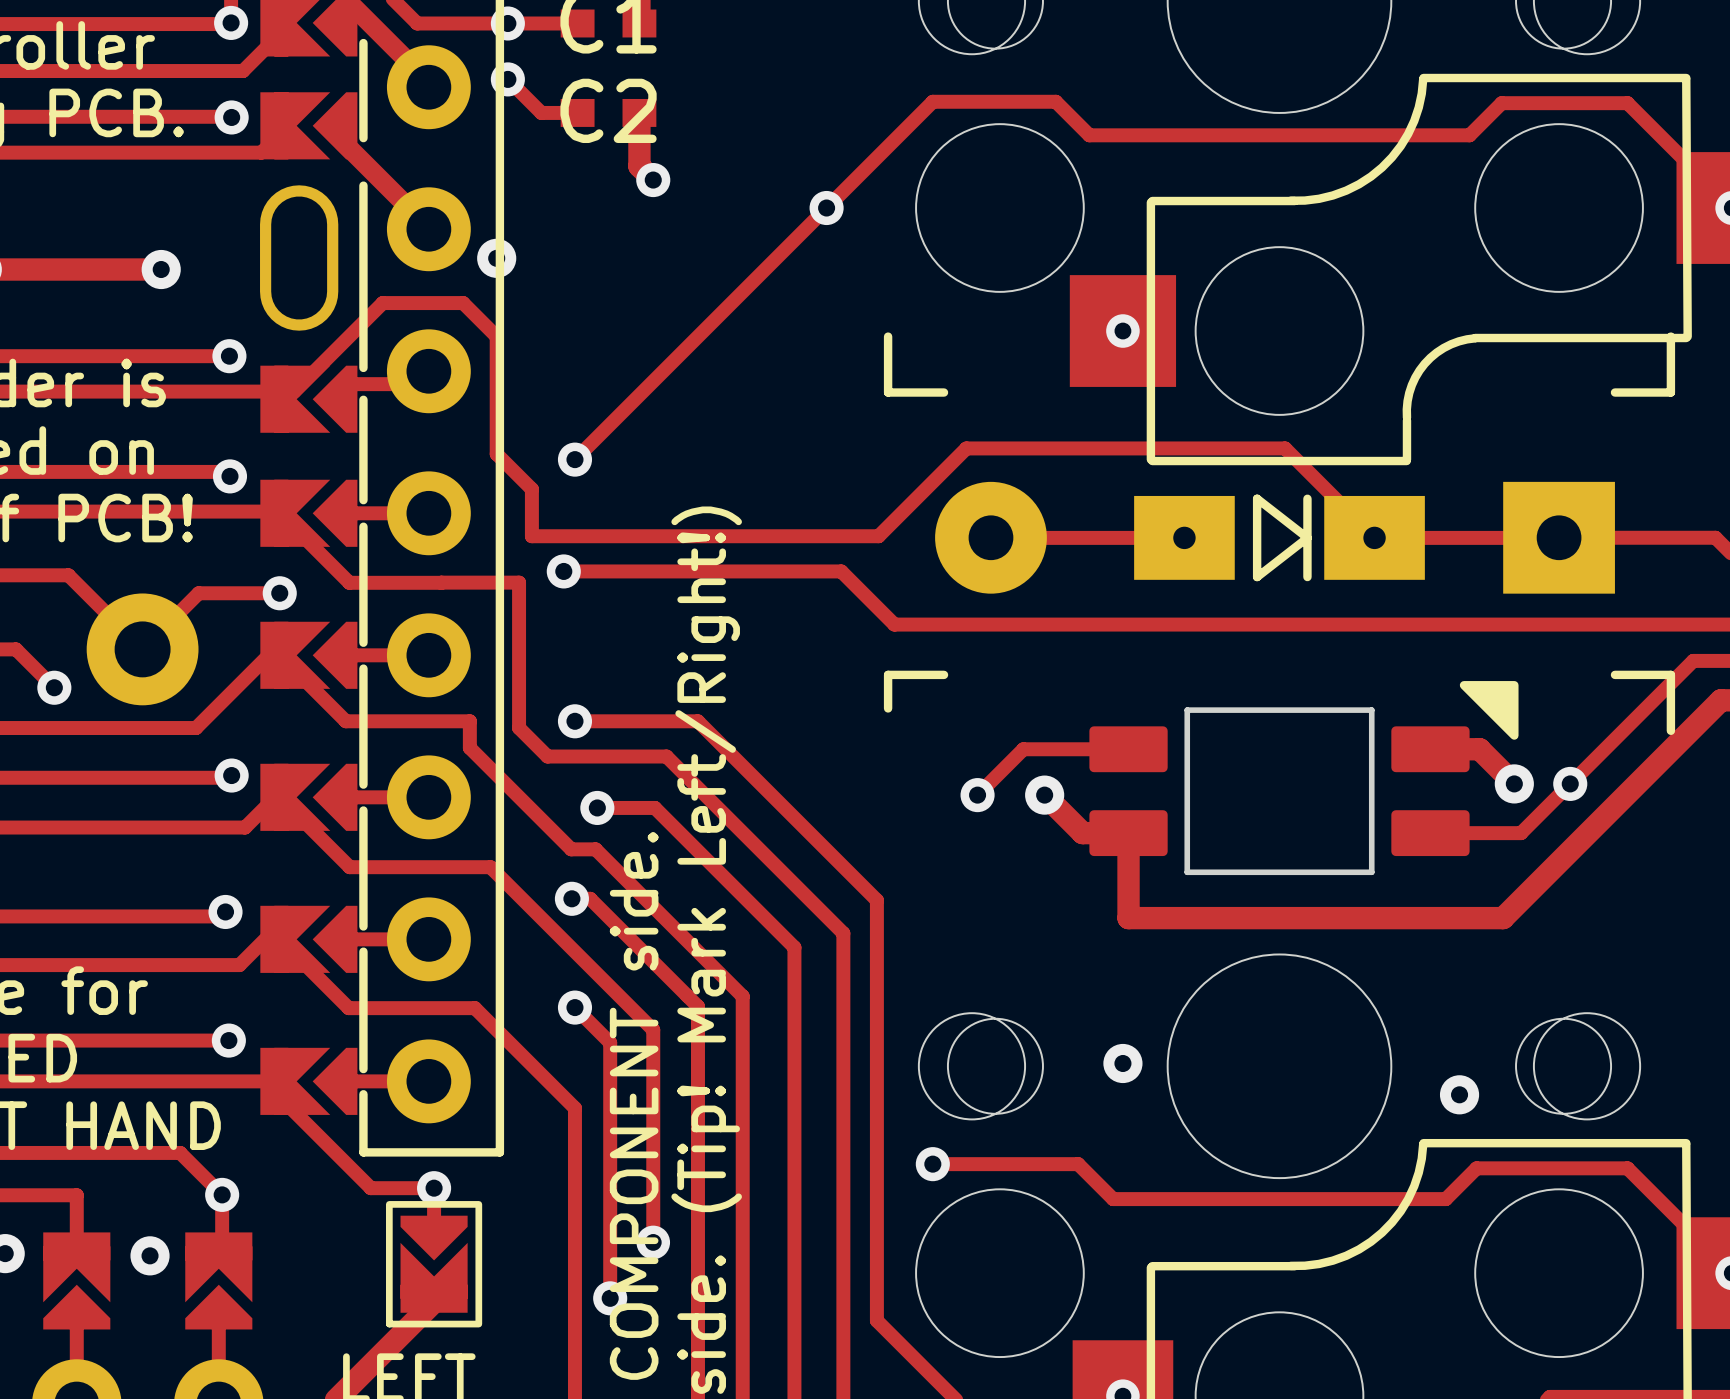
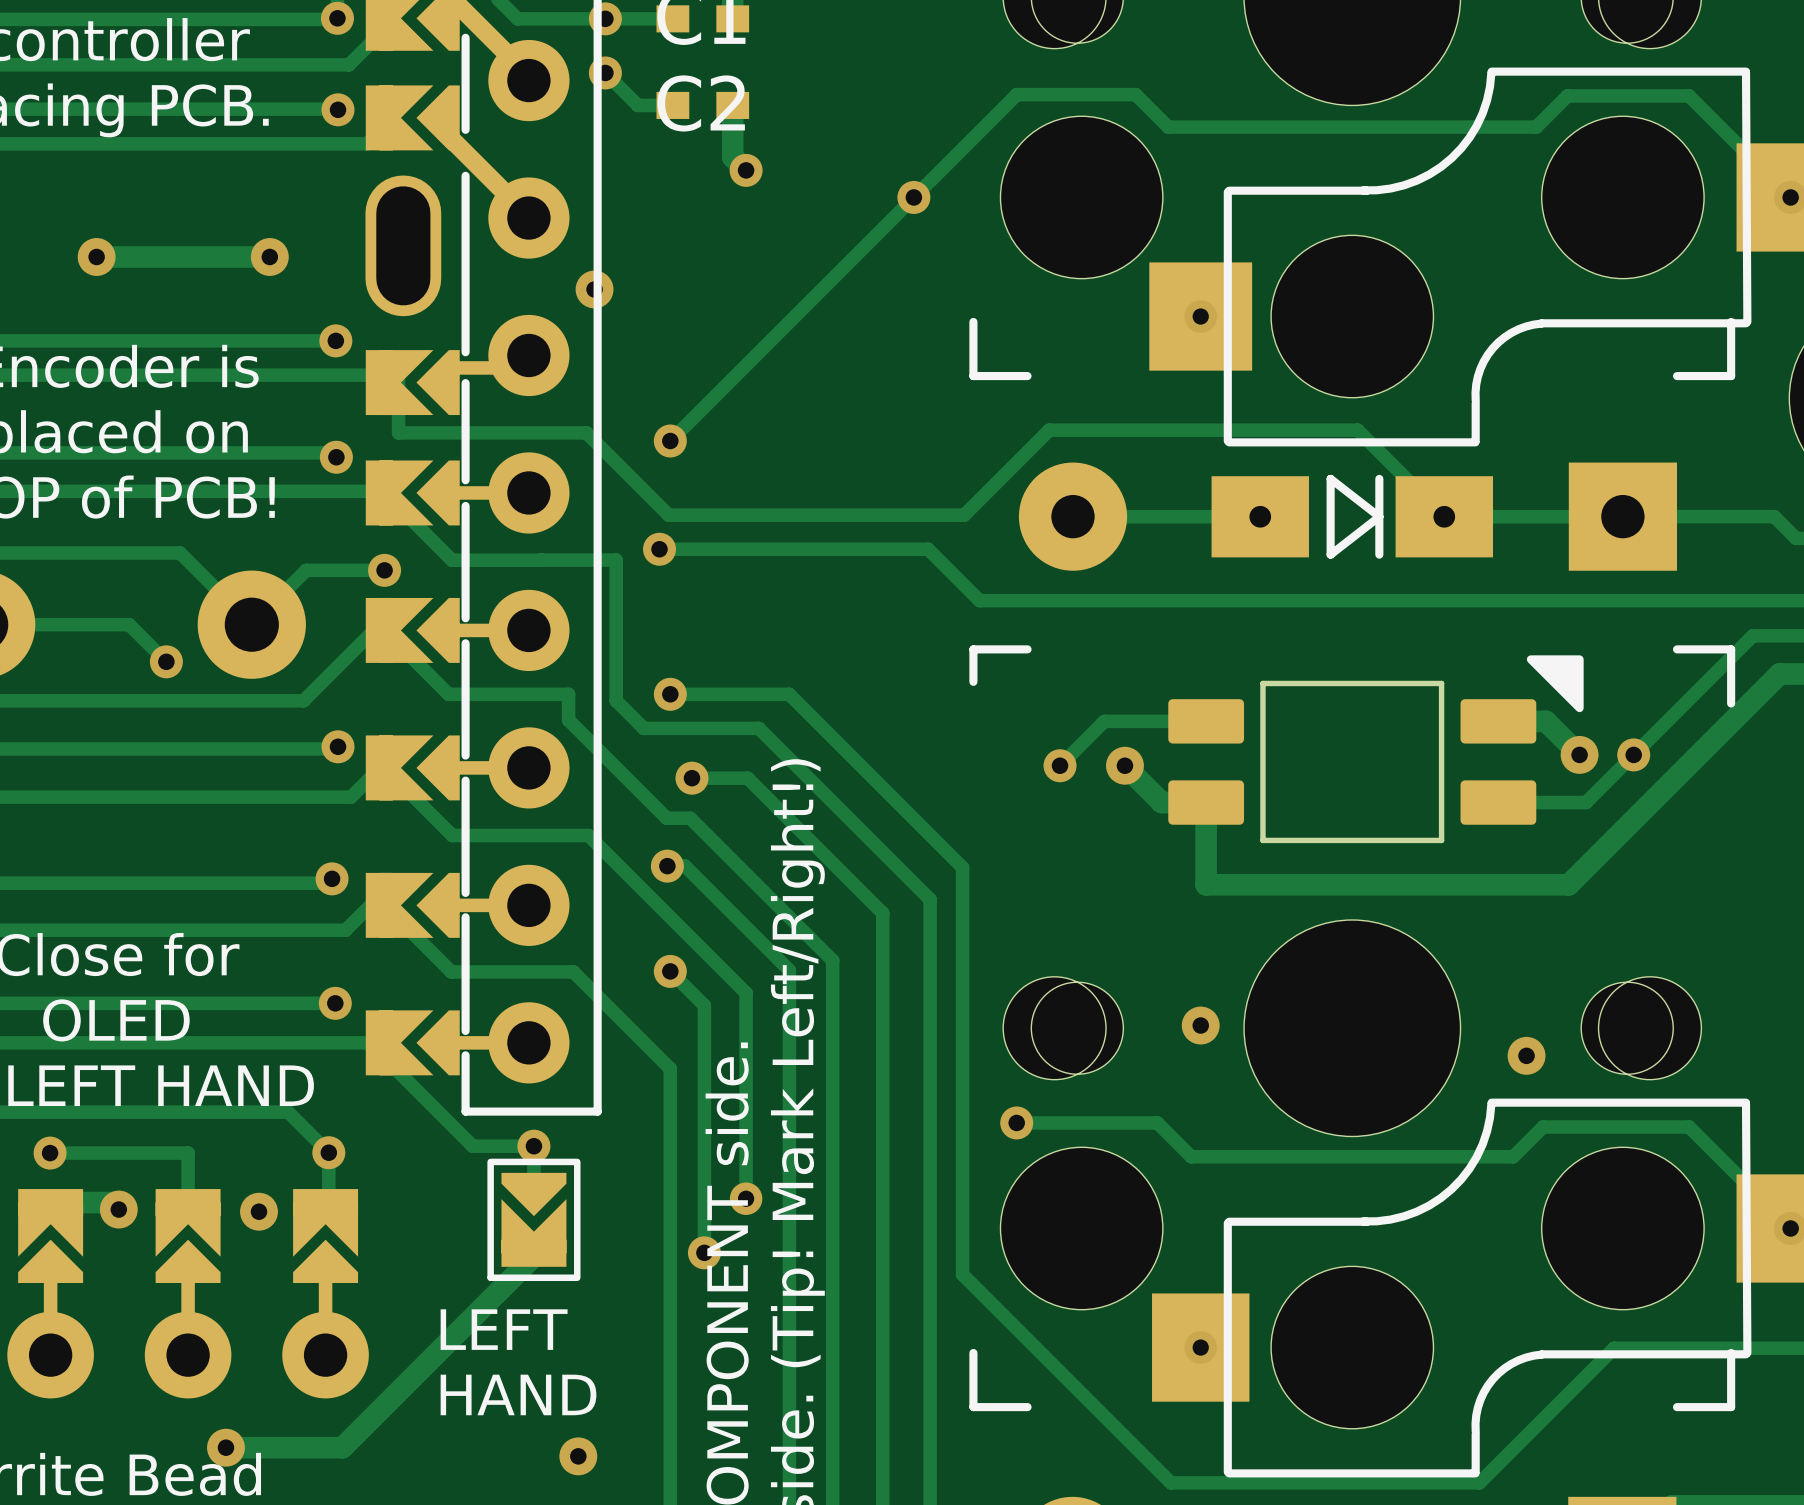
via position: (496, 258) -> (594, 289)
track: (294, 391) (382, 303) (463, 303) (496, 336) (496, 454) (531, 489) (531, 536) (573, 536) -> (398, 375) (398, 432) (586, 432) (668, 515)

